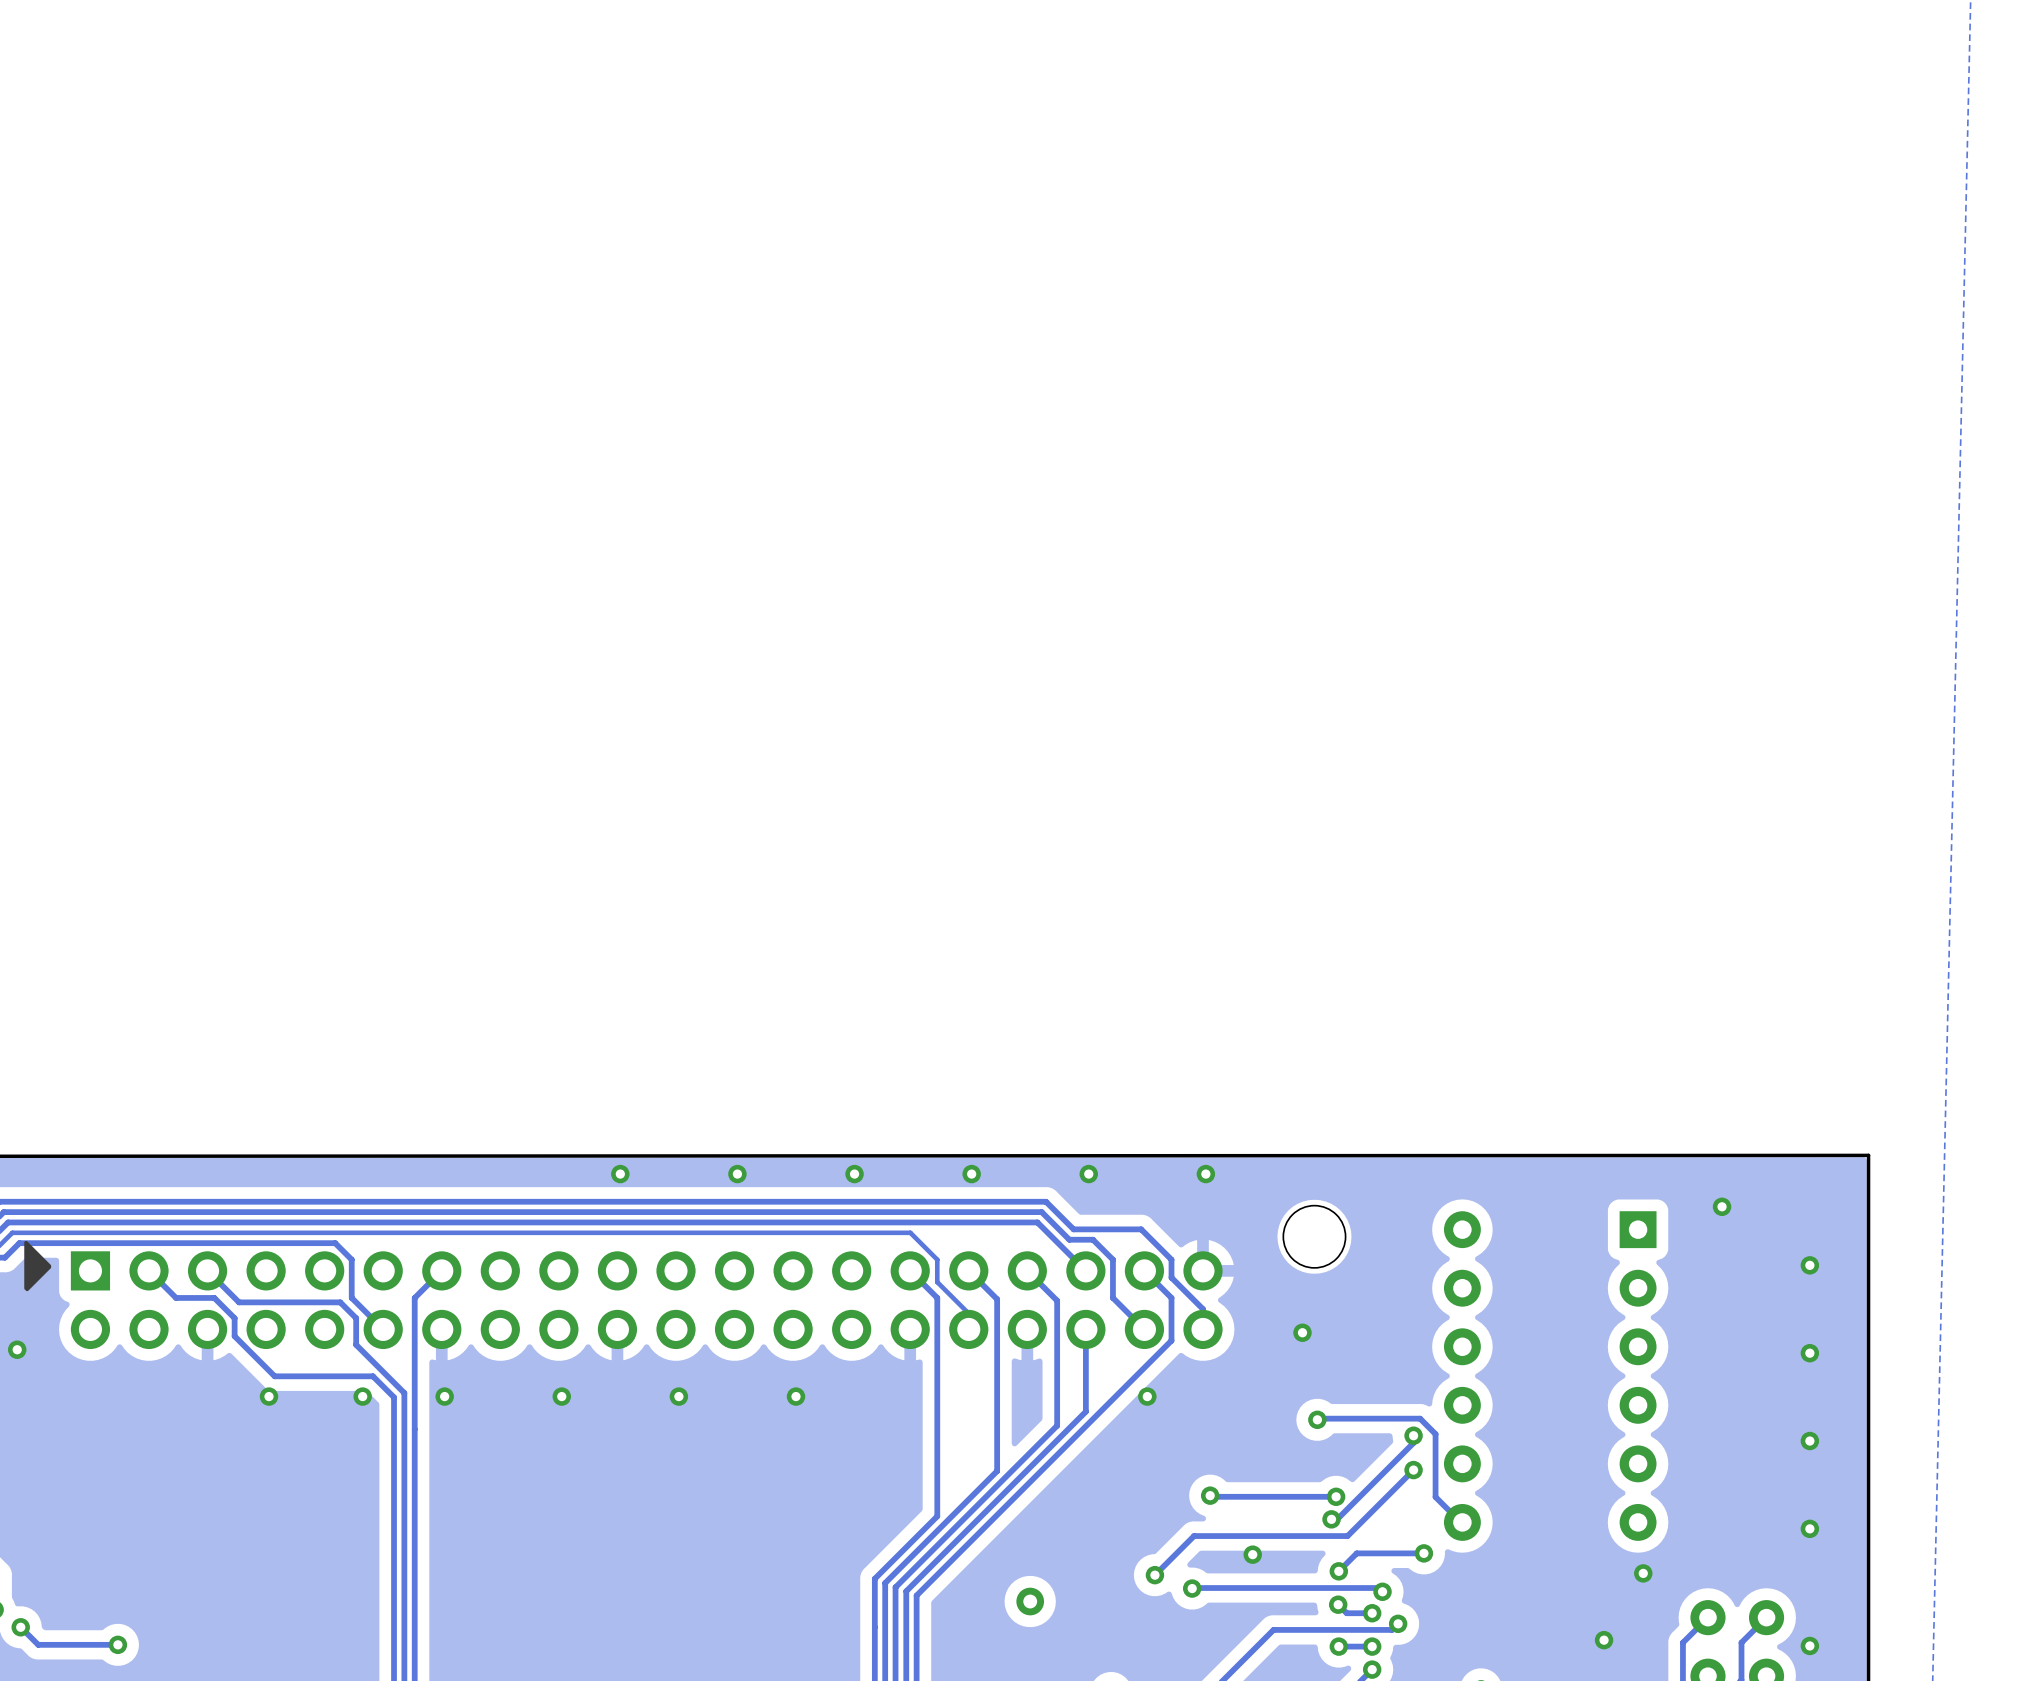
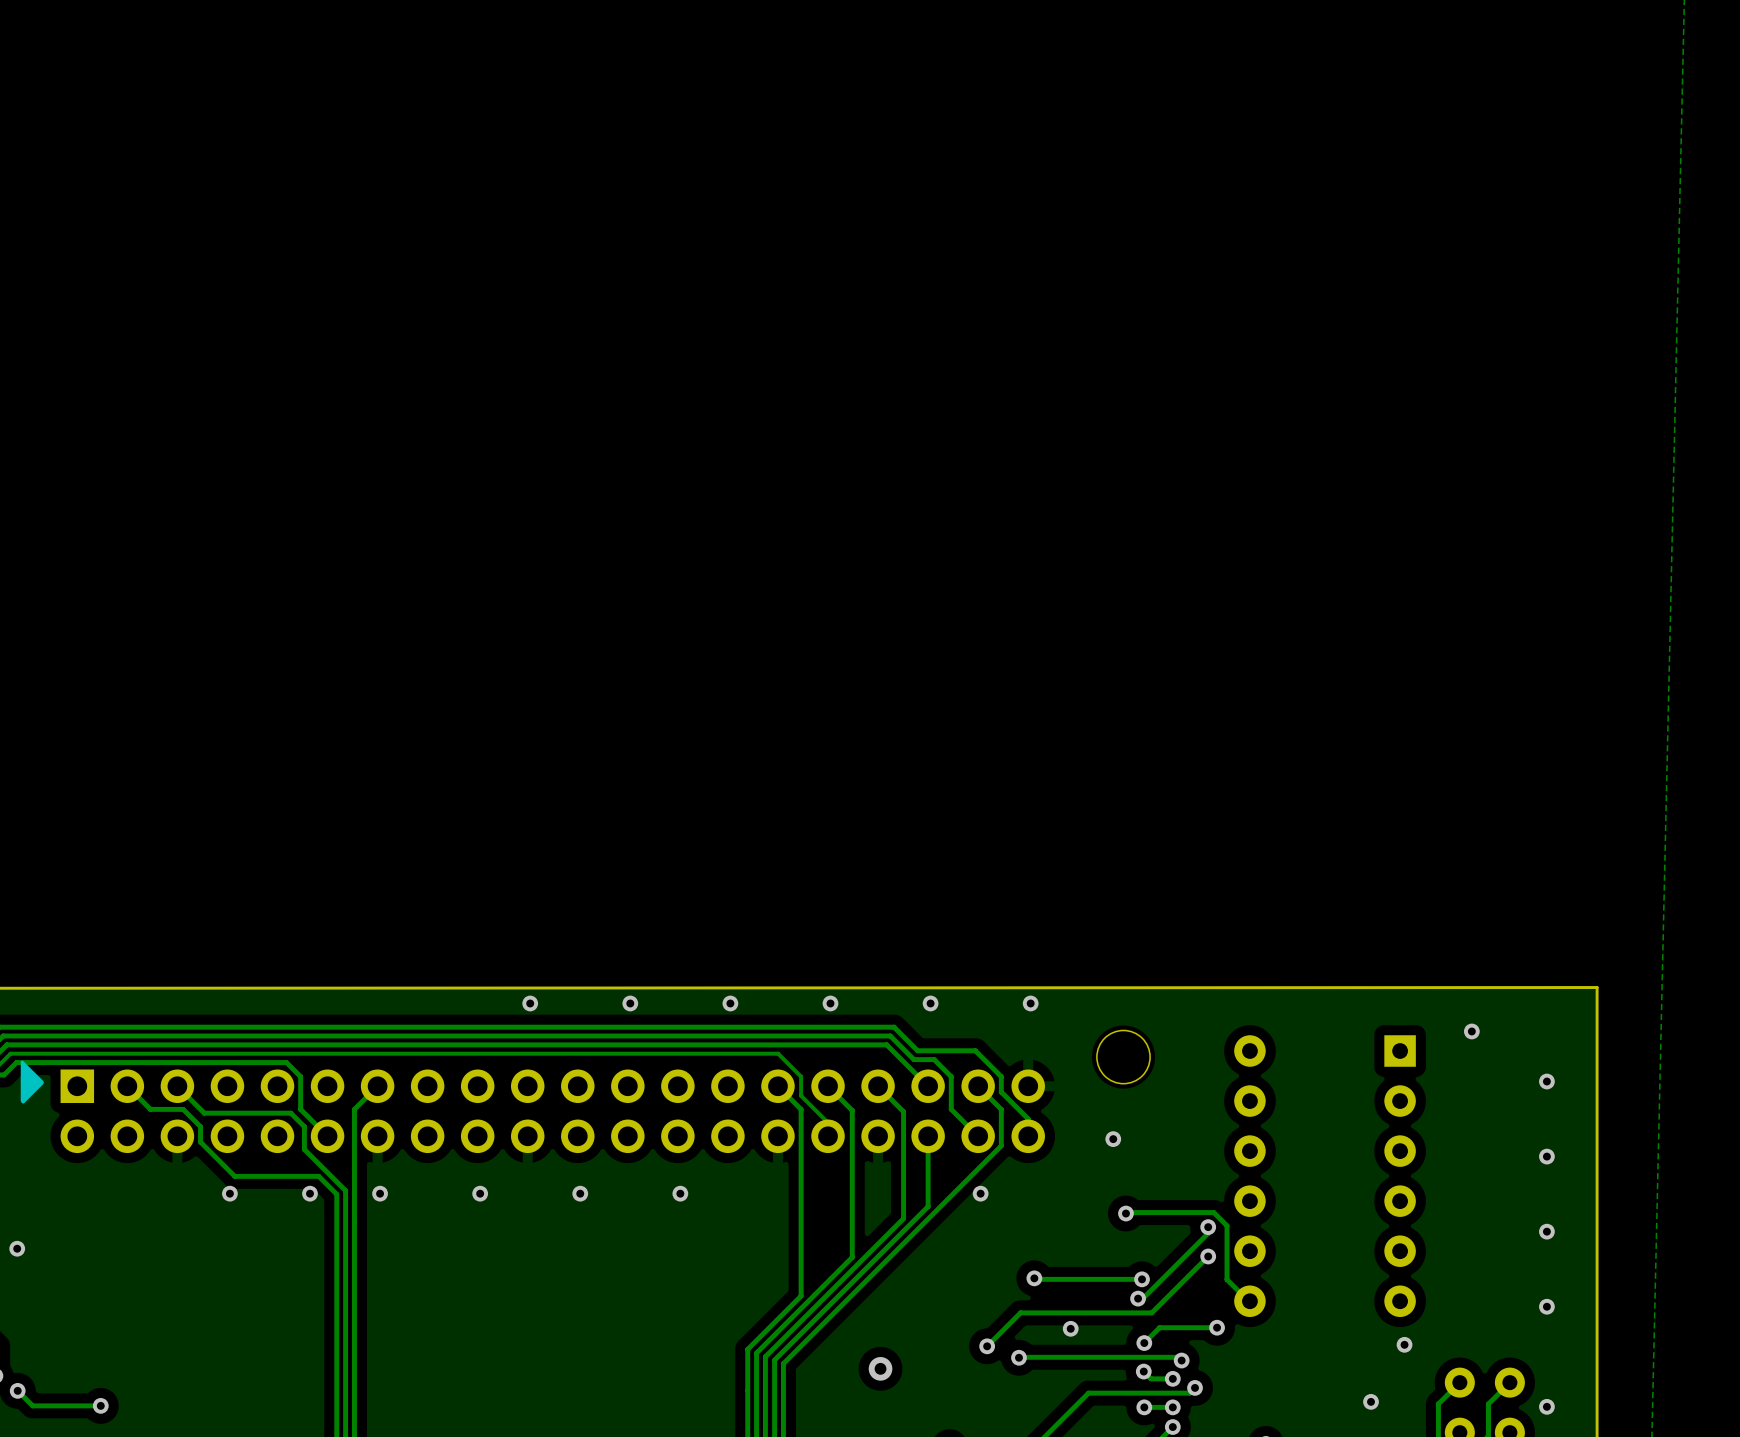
via position: (17, 1349) -> (17, 1248)

